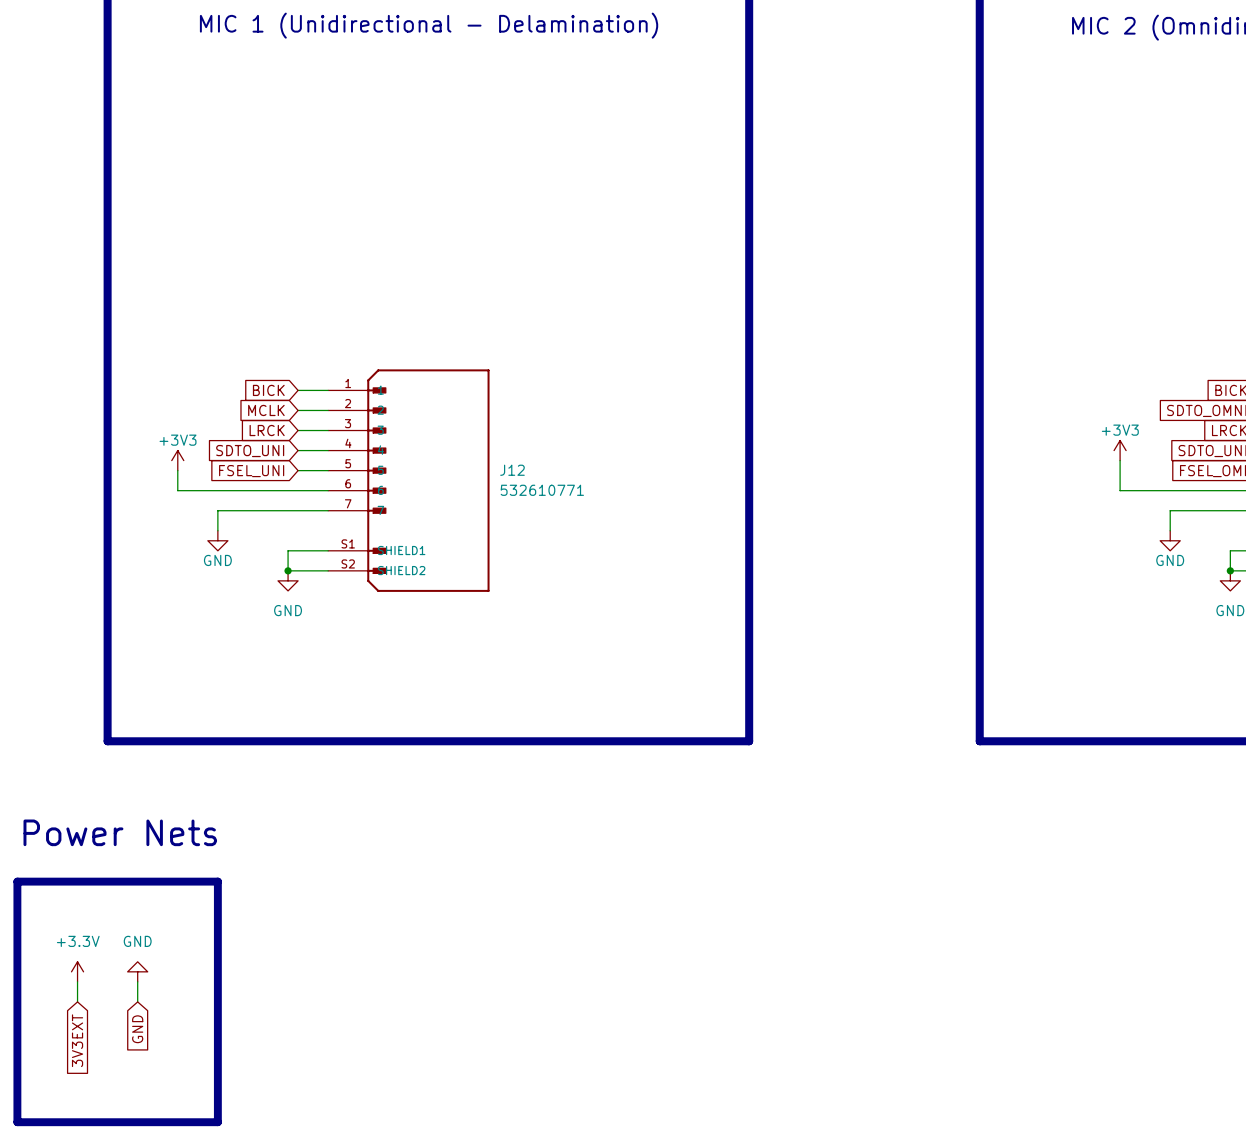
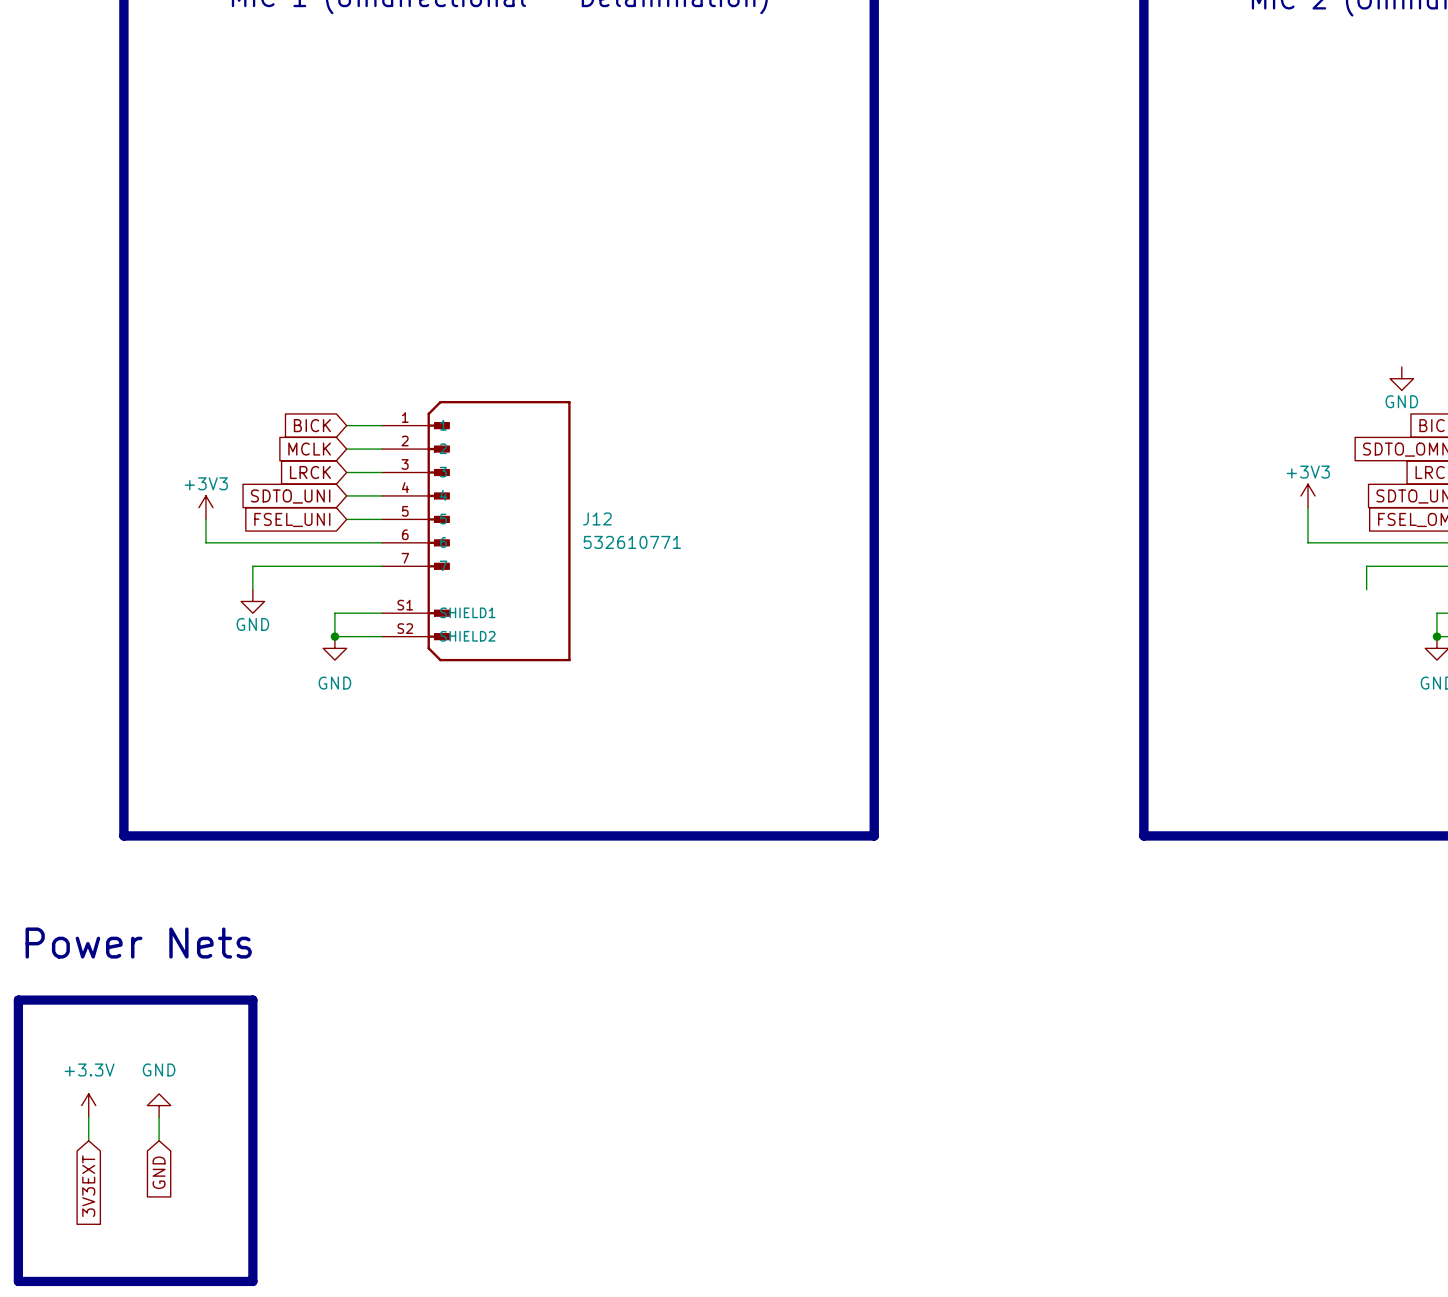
power symbol position: GND (1170, 540) -> GND (1401, 378)

